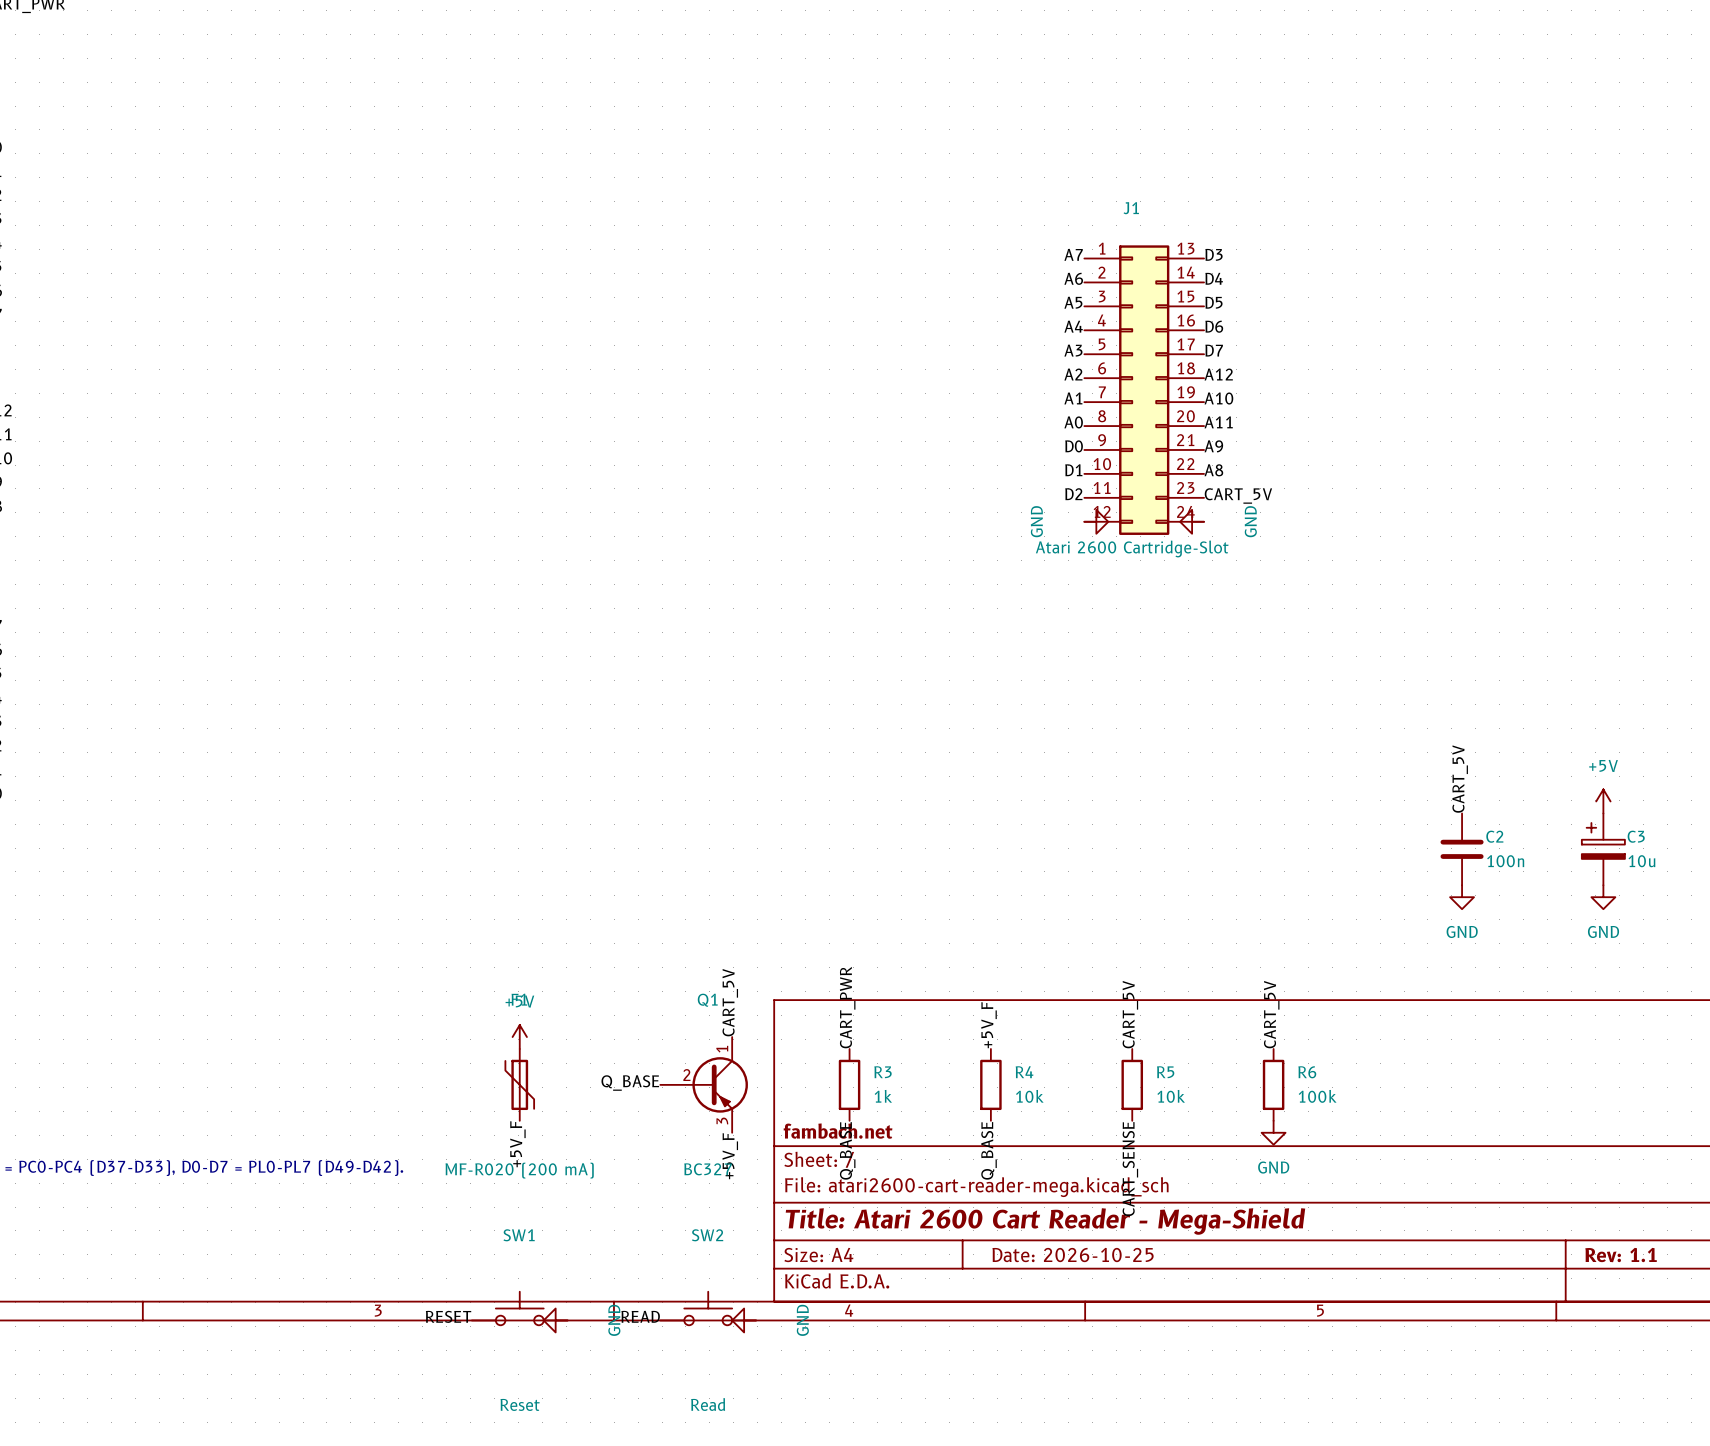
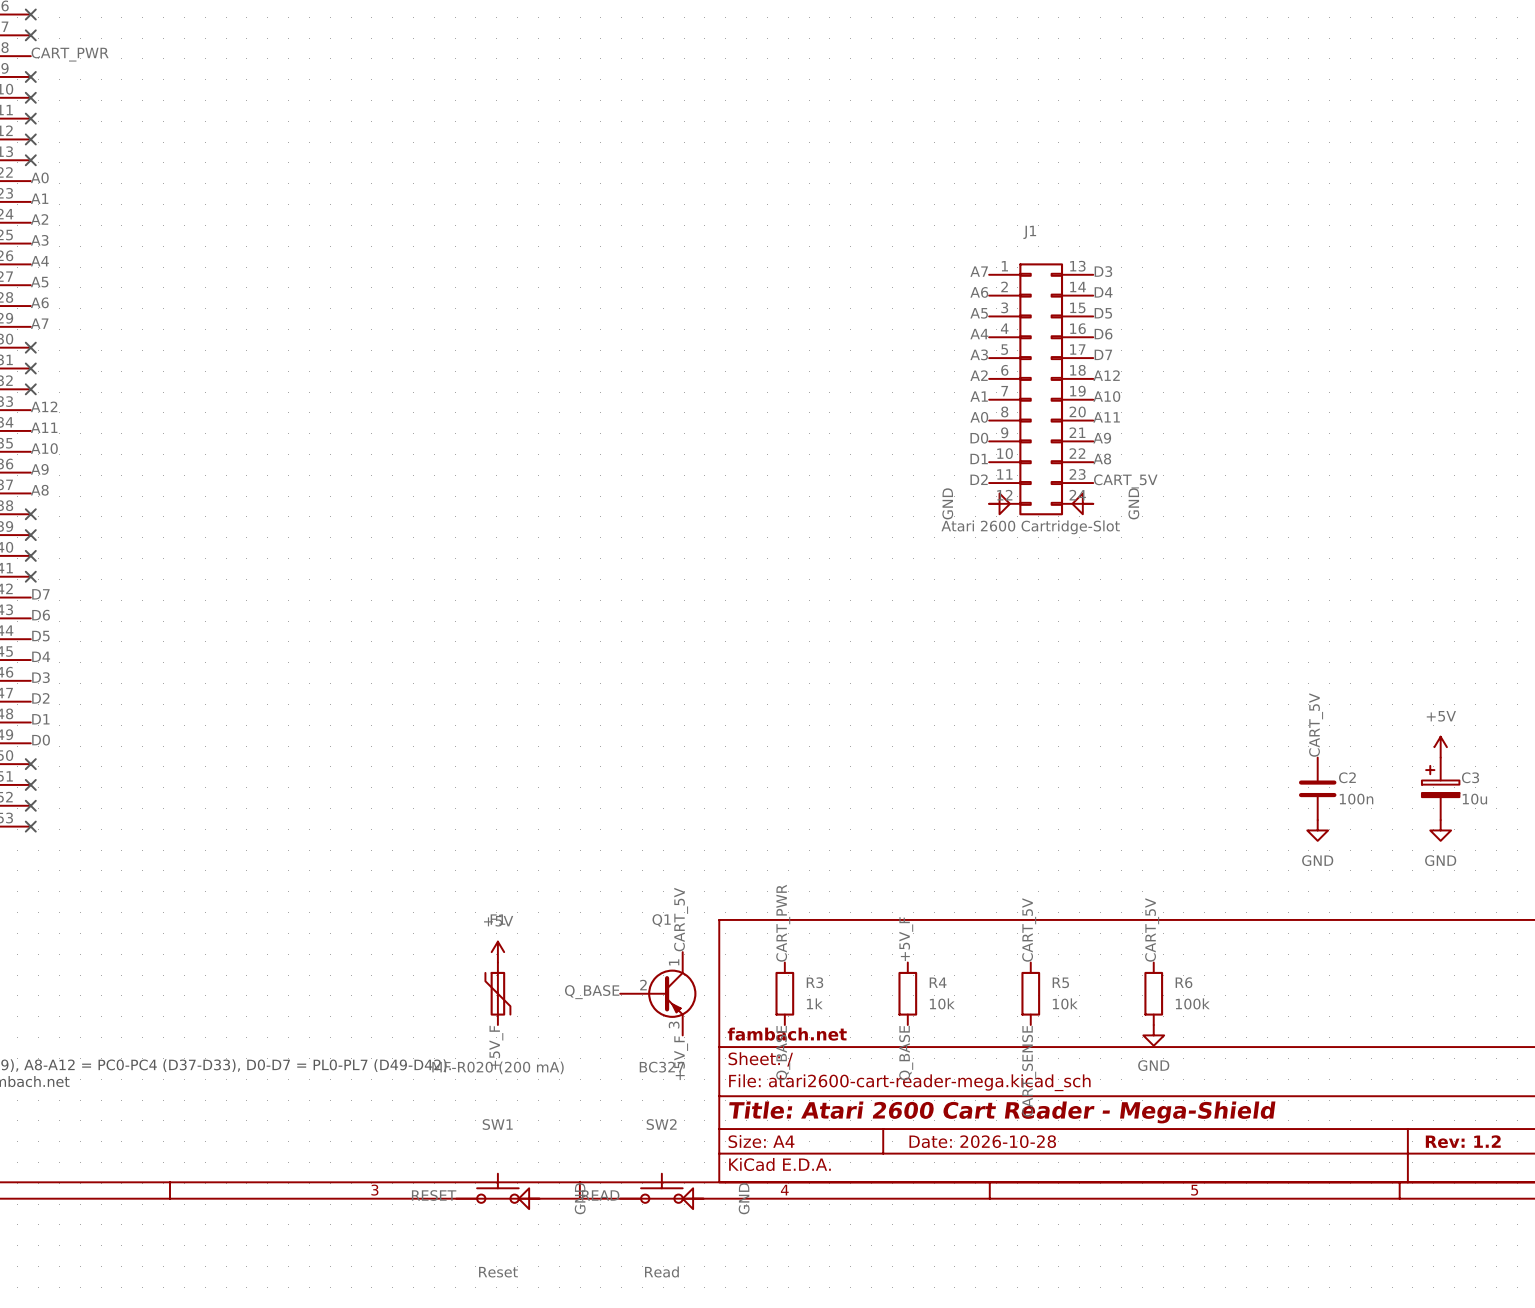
title block: Date: 2026-10-25 (1073, 1255) -> Date: 2026-10-28 (982, 1141)
title block: Rev: 1.1 (1621, 1255) -> Rev: 1.2 (1463, 1141)

